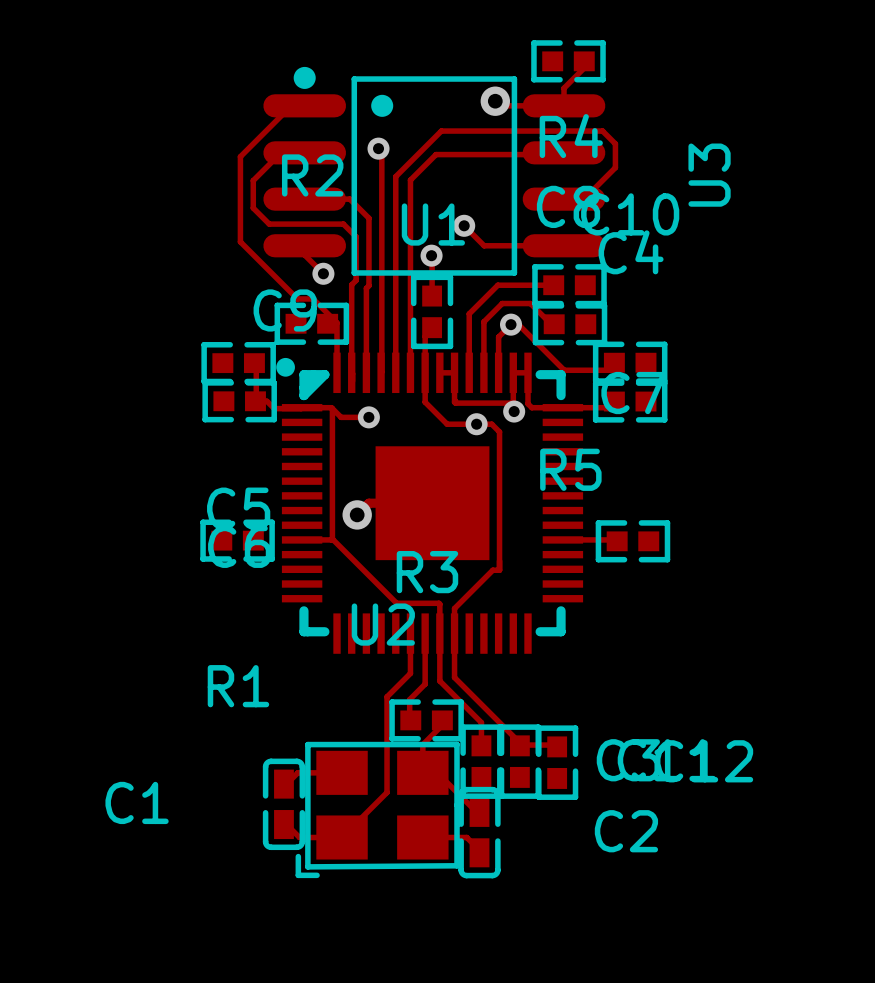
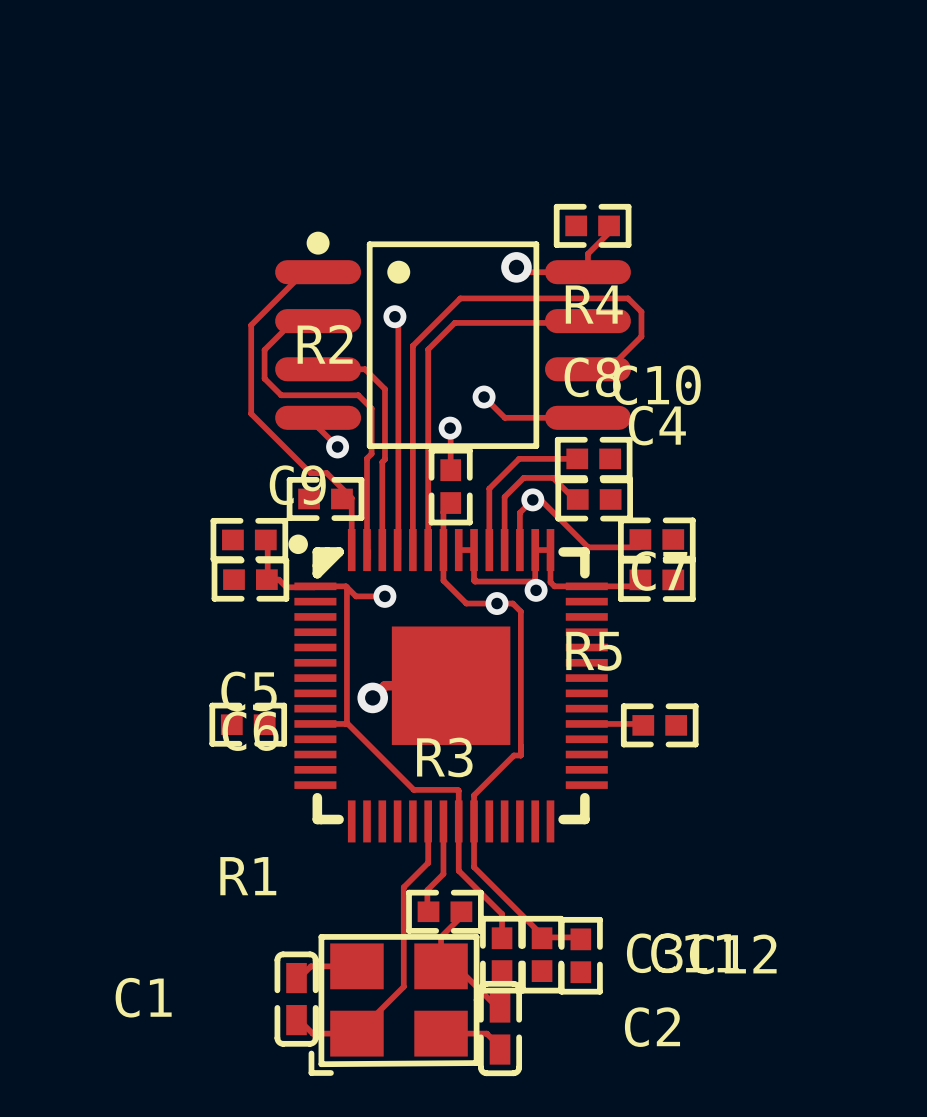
U3 name: U3 (709, 175) -> none
U1 name: U1 (433, 224) -> none
U2 name: U2 (383, 624) -> none

